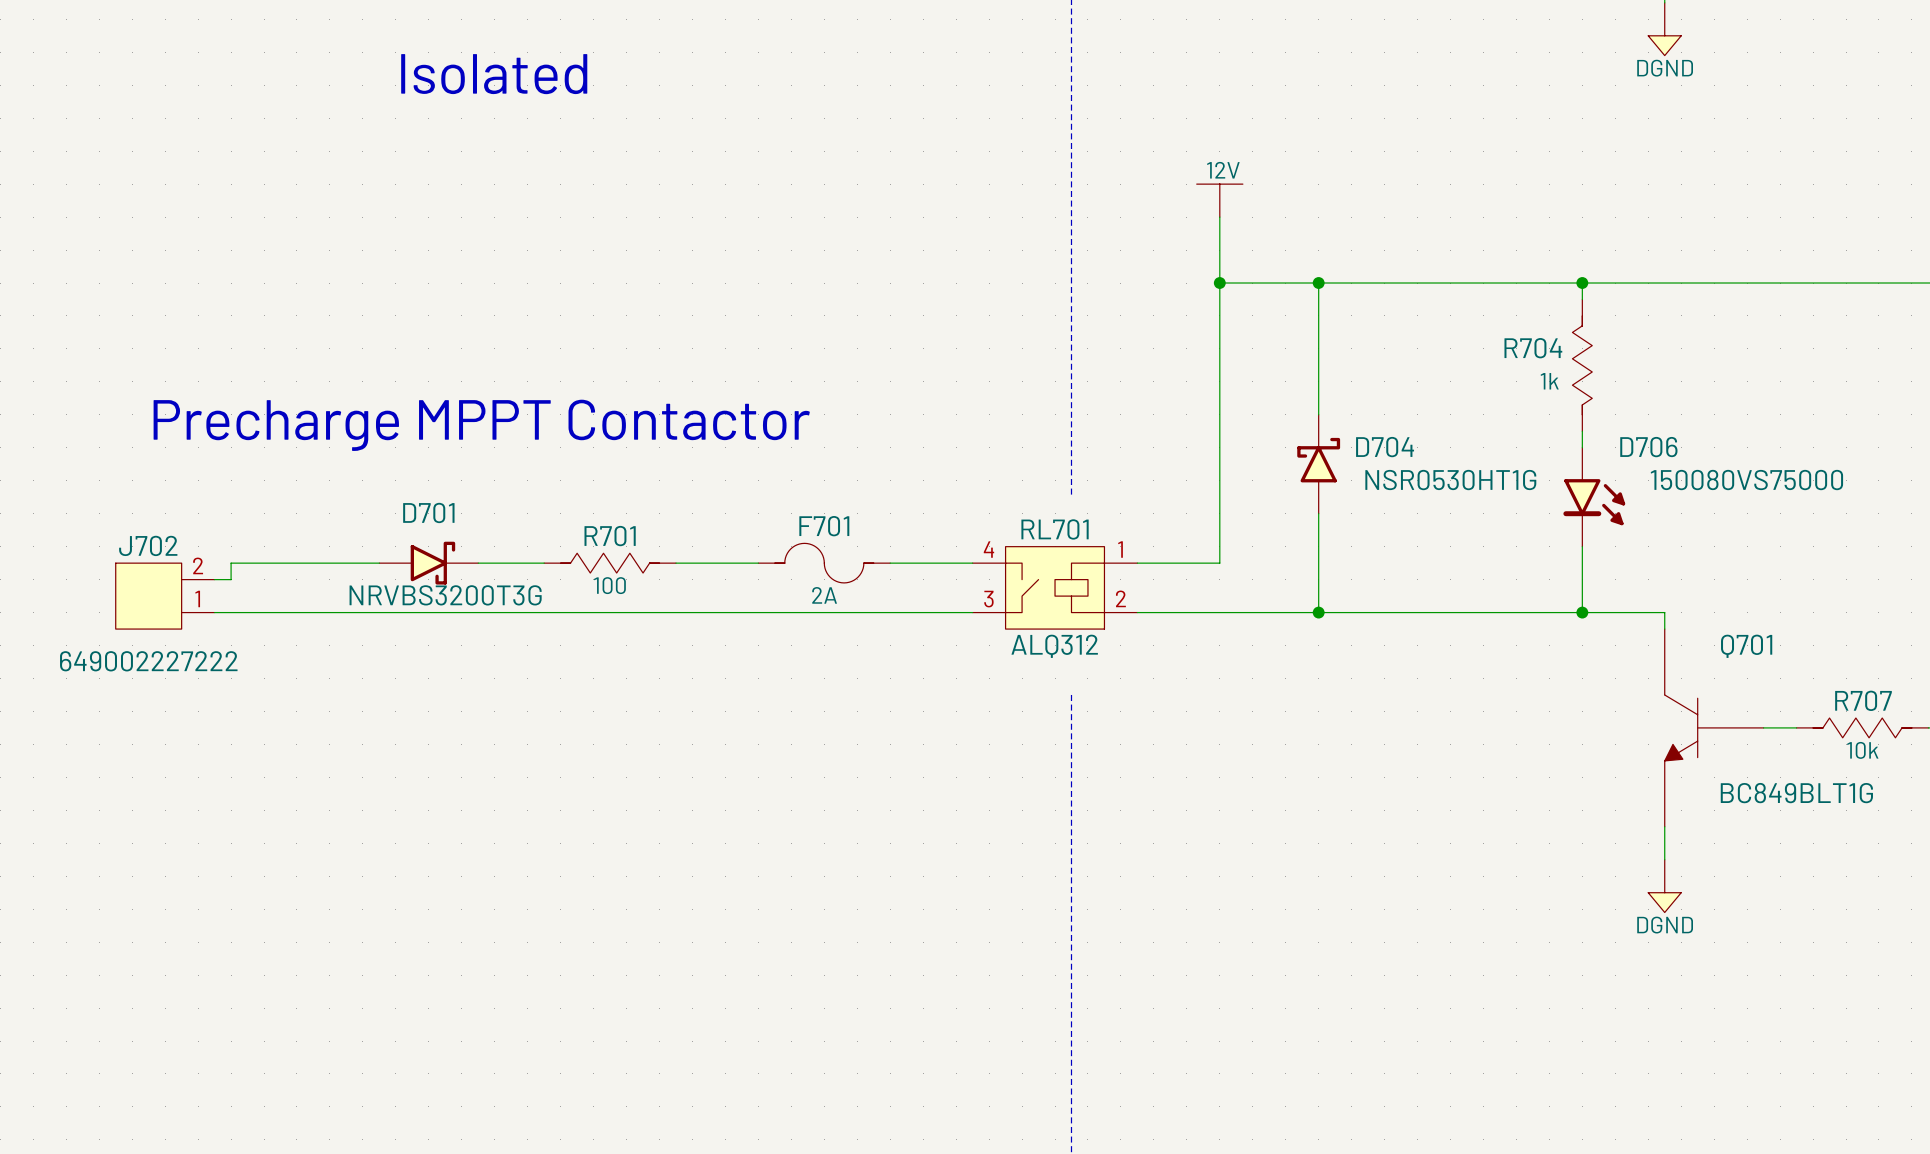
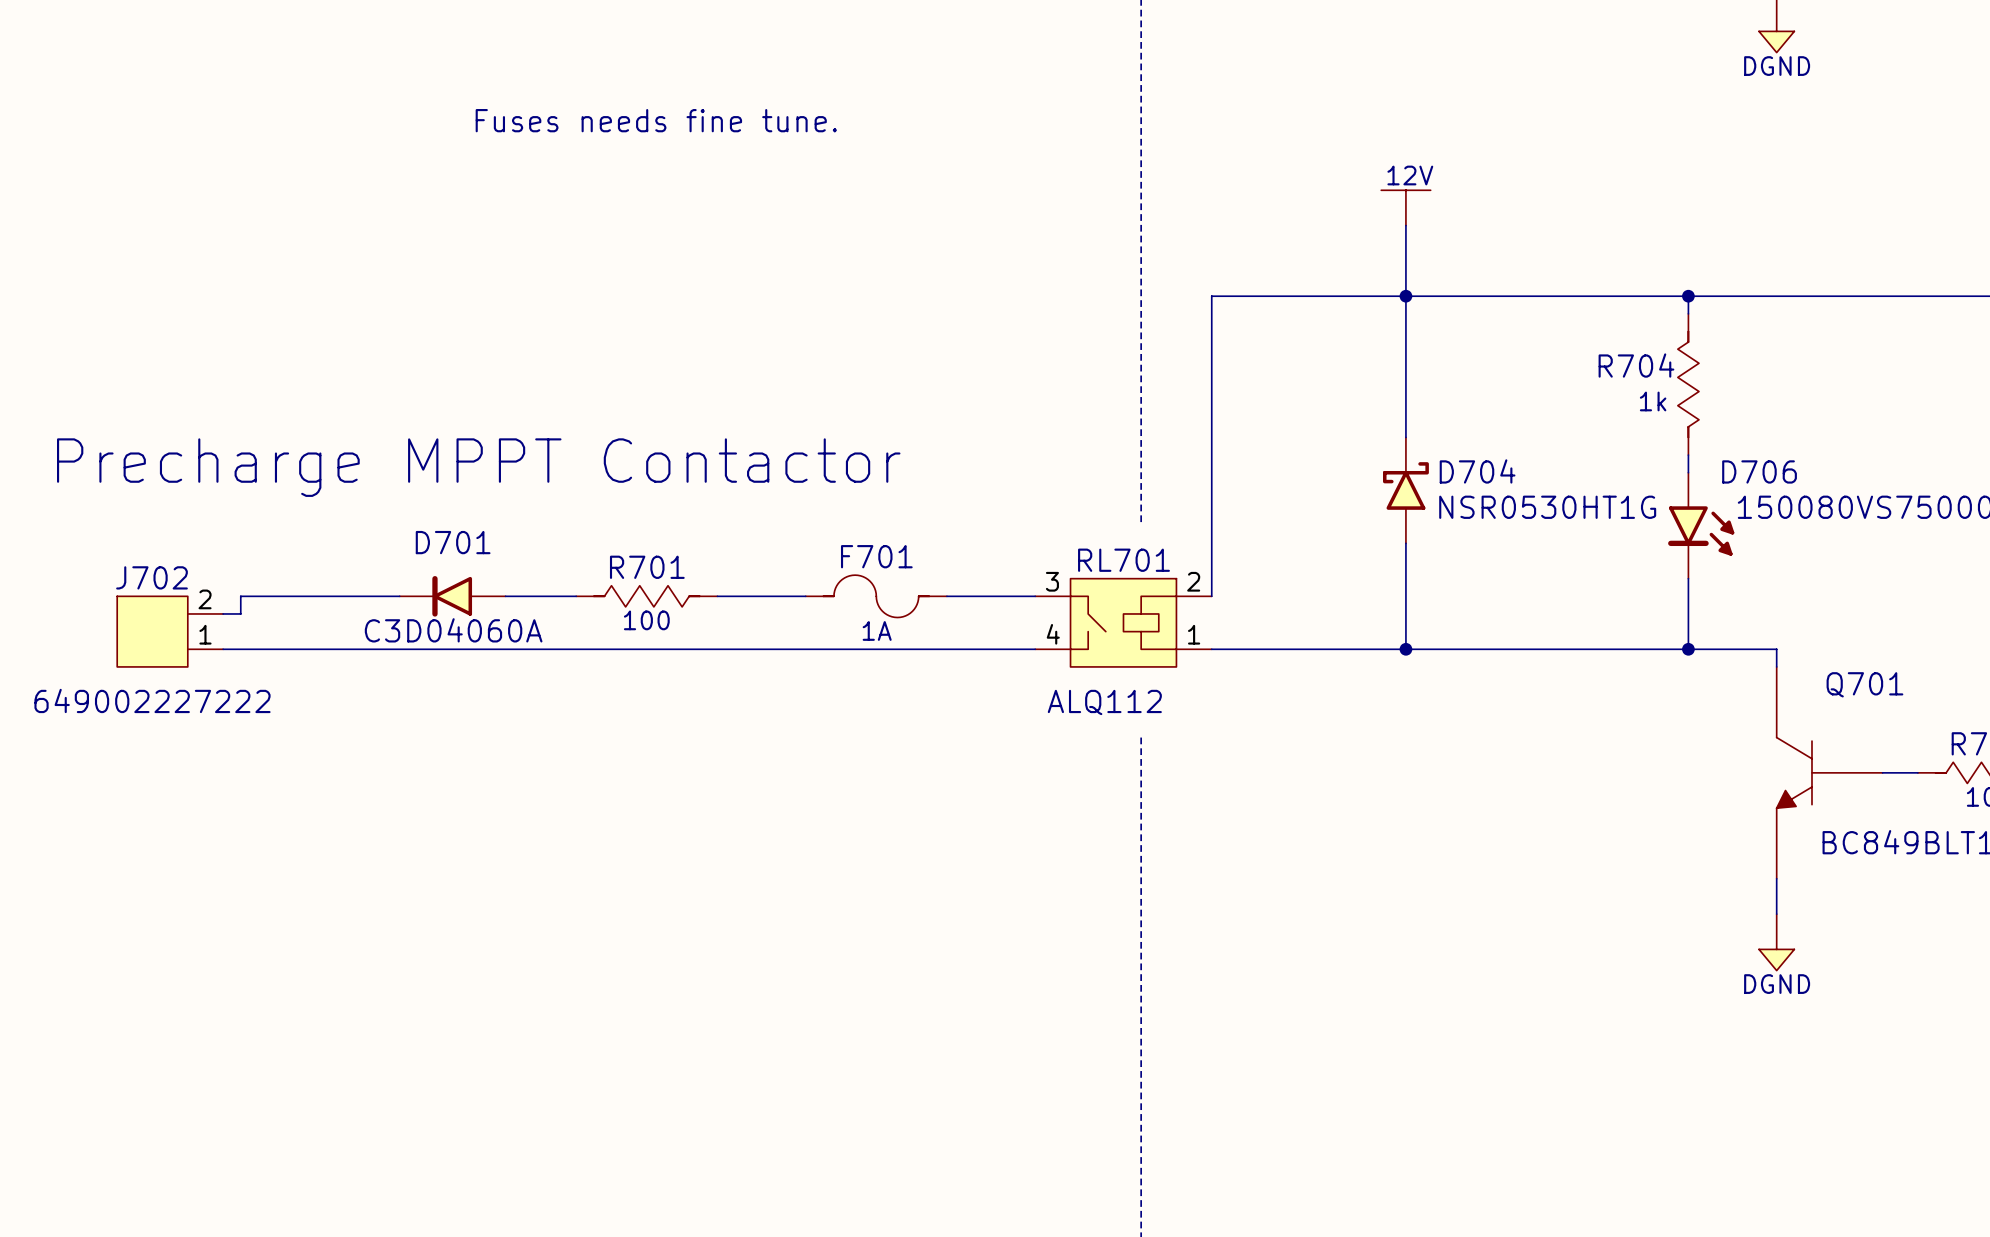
text: Isolated (494, 74) -> none
text: none -> Fuses needs fine tune. (656, 120)
power symbol position: 12V (1219, 200) -> 12V (1405, 207)
wire: (1219, 217) (1219, 563) (1137, 563) -> (1300, 296) (1211, 296) (1211, 596)
wire: none -> (1405, 225) (1405, 296)
junction: (1219, 283) -> none
text position: Precharge MPPT Contactor (481, 425) -> Precharge MPPT Contactor (478, 467)
D701 symbol: [379, 541, 479, 585] -> [399, 576, 506, 617]
RL701 flip: as is (1055, 587) -> up-down (1123, 622)
D701 value: NRVBS3200T3G (445, 595) -> C3D04060A (453, 630)
F701 text: 2A (824, 595) -> 1A (877, 630)
RL701 value: ALQ312 (1054, 646) -> ALQ112 (1104, 702)

